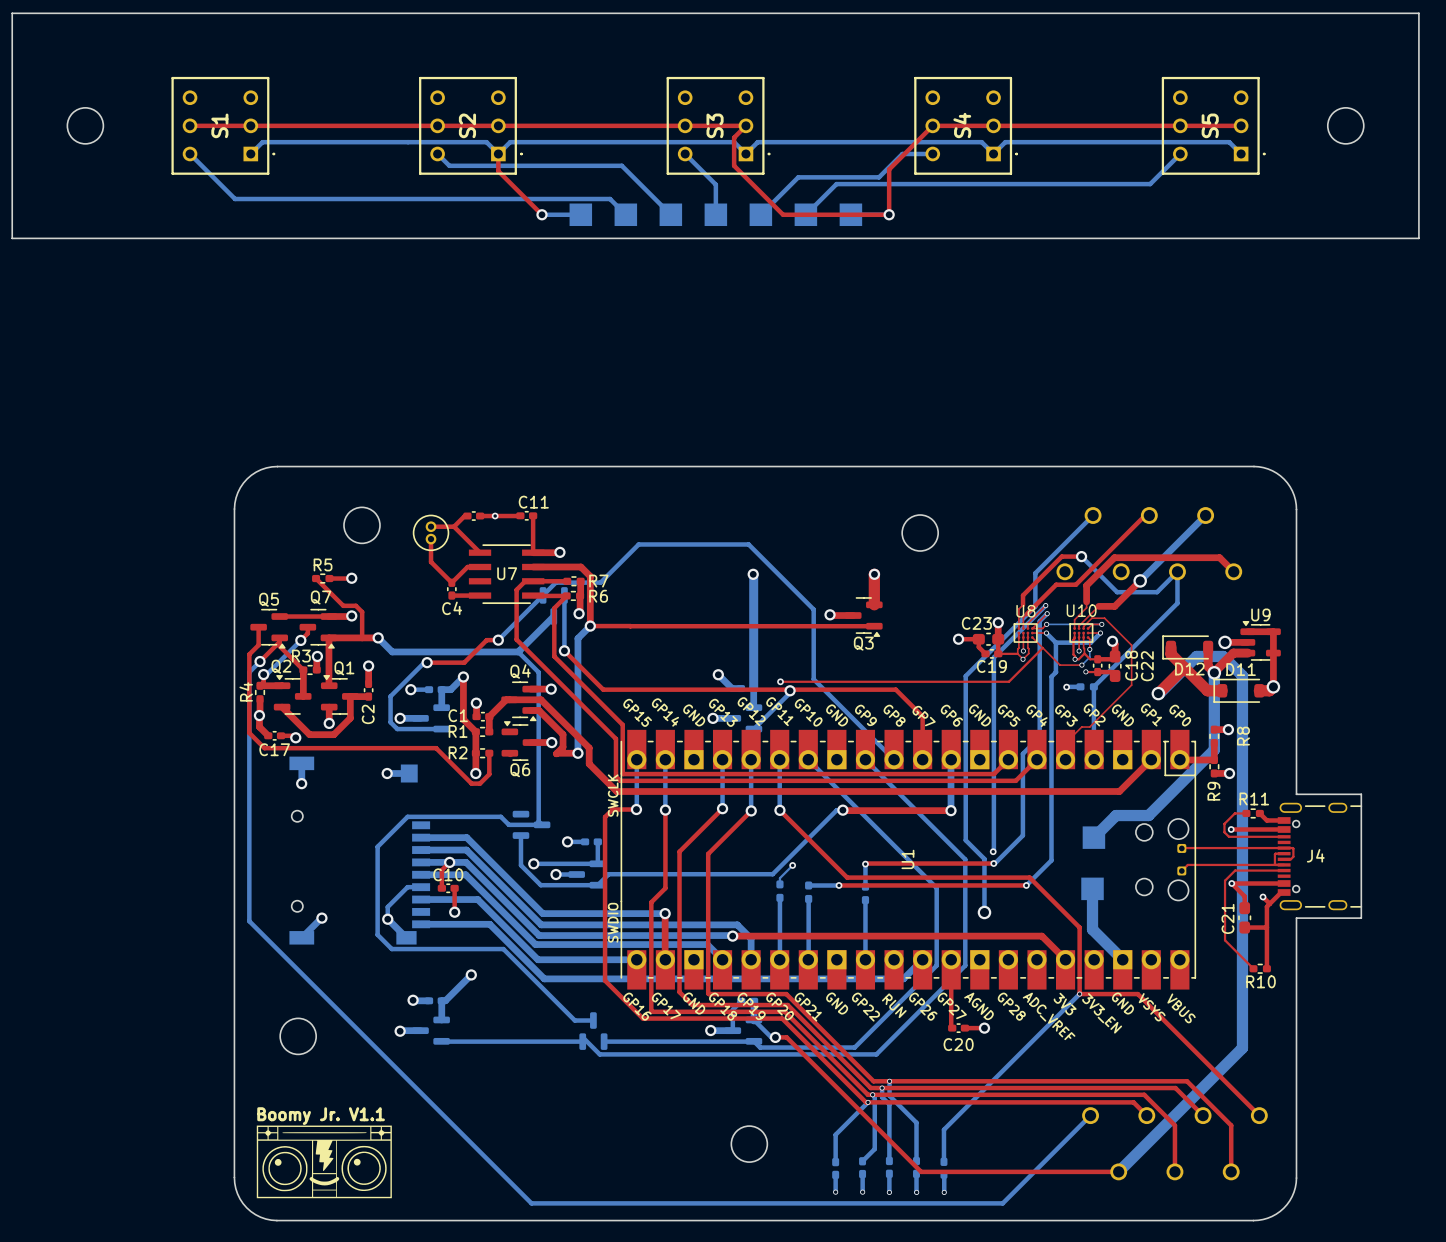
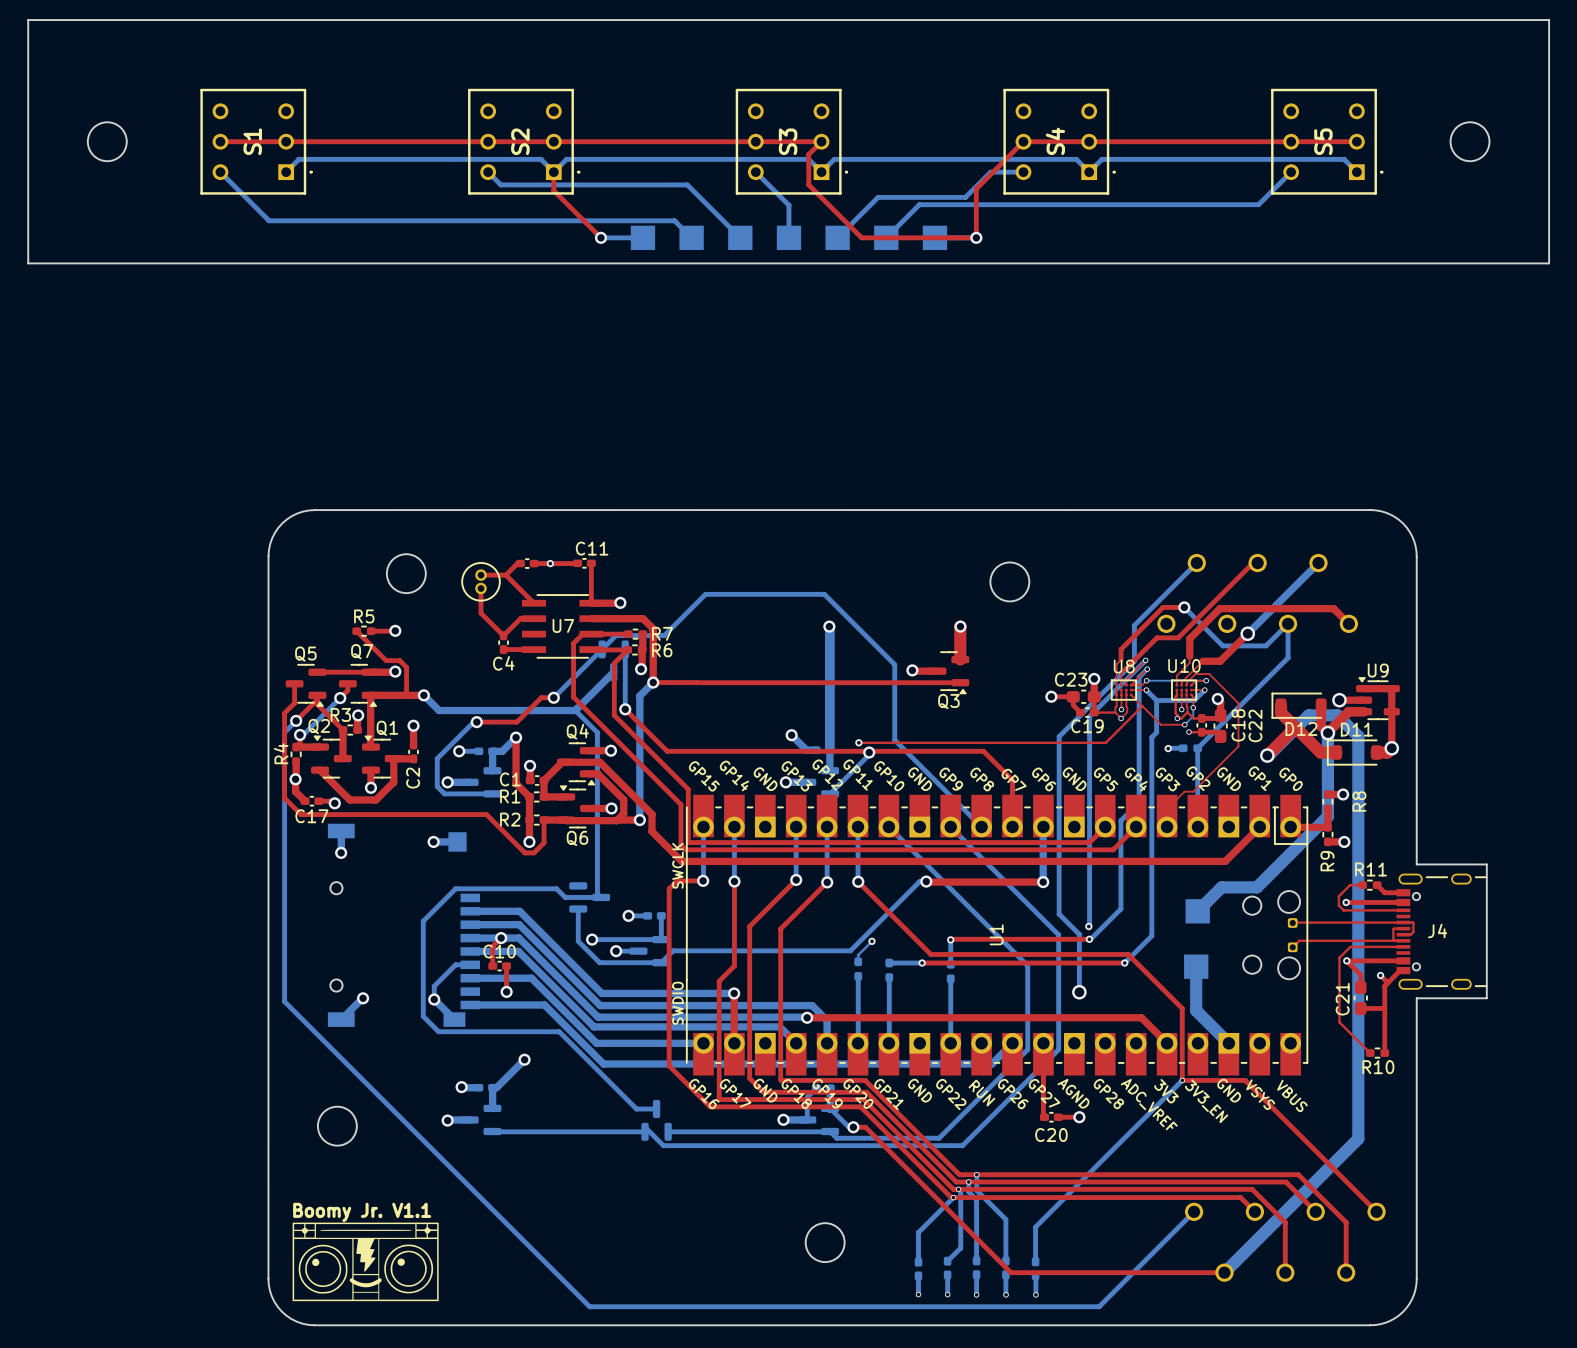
top track: none -> (544, 796) (566, 796)
top track: none -> (544, 820) (566, 820)
top track: none -> (566, 820) (616, 820)

